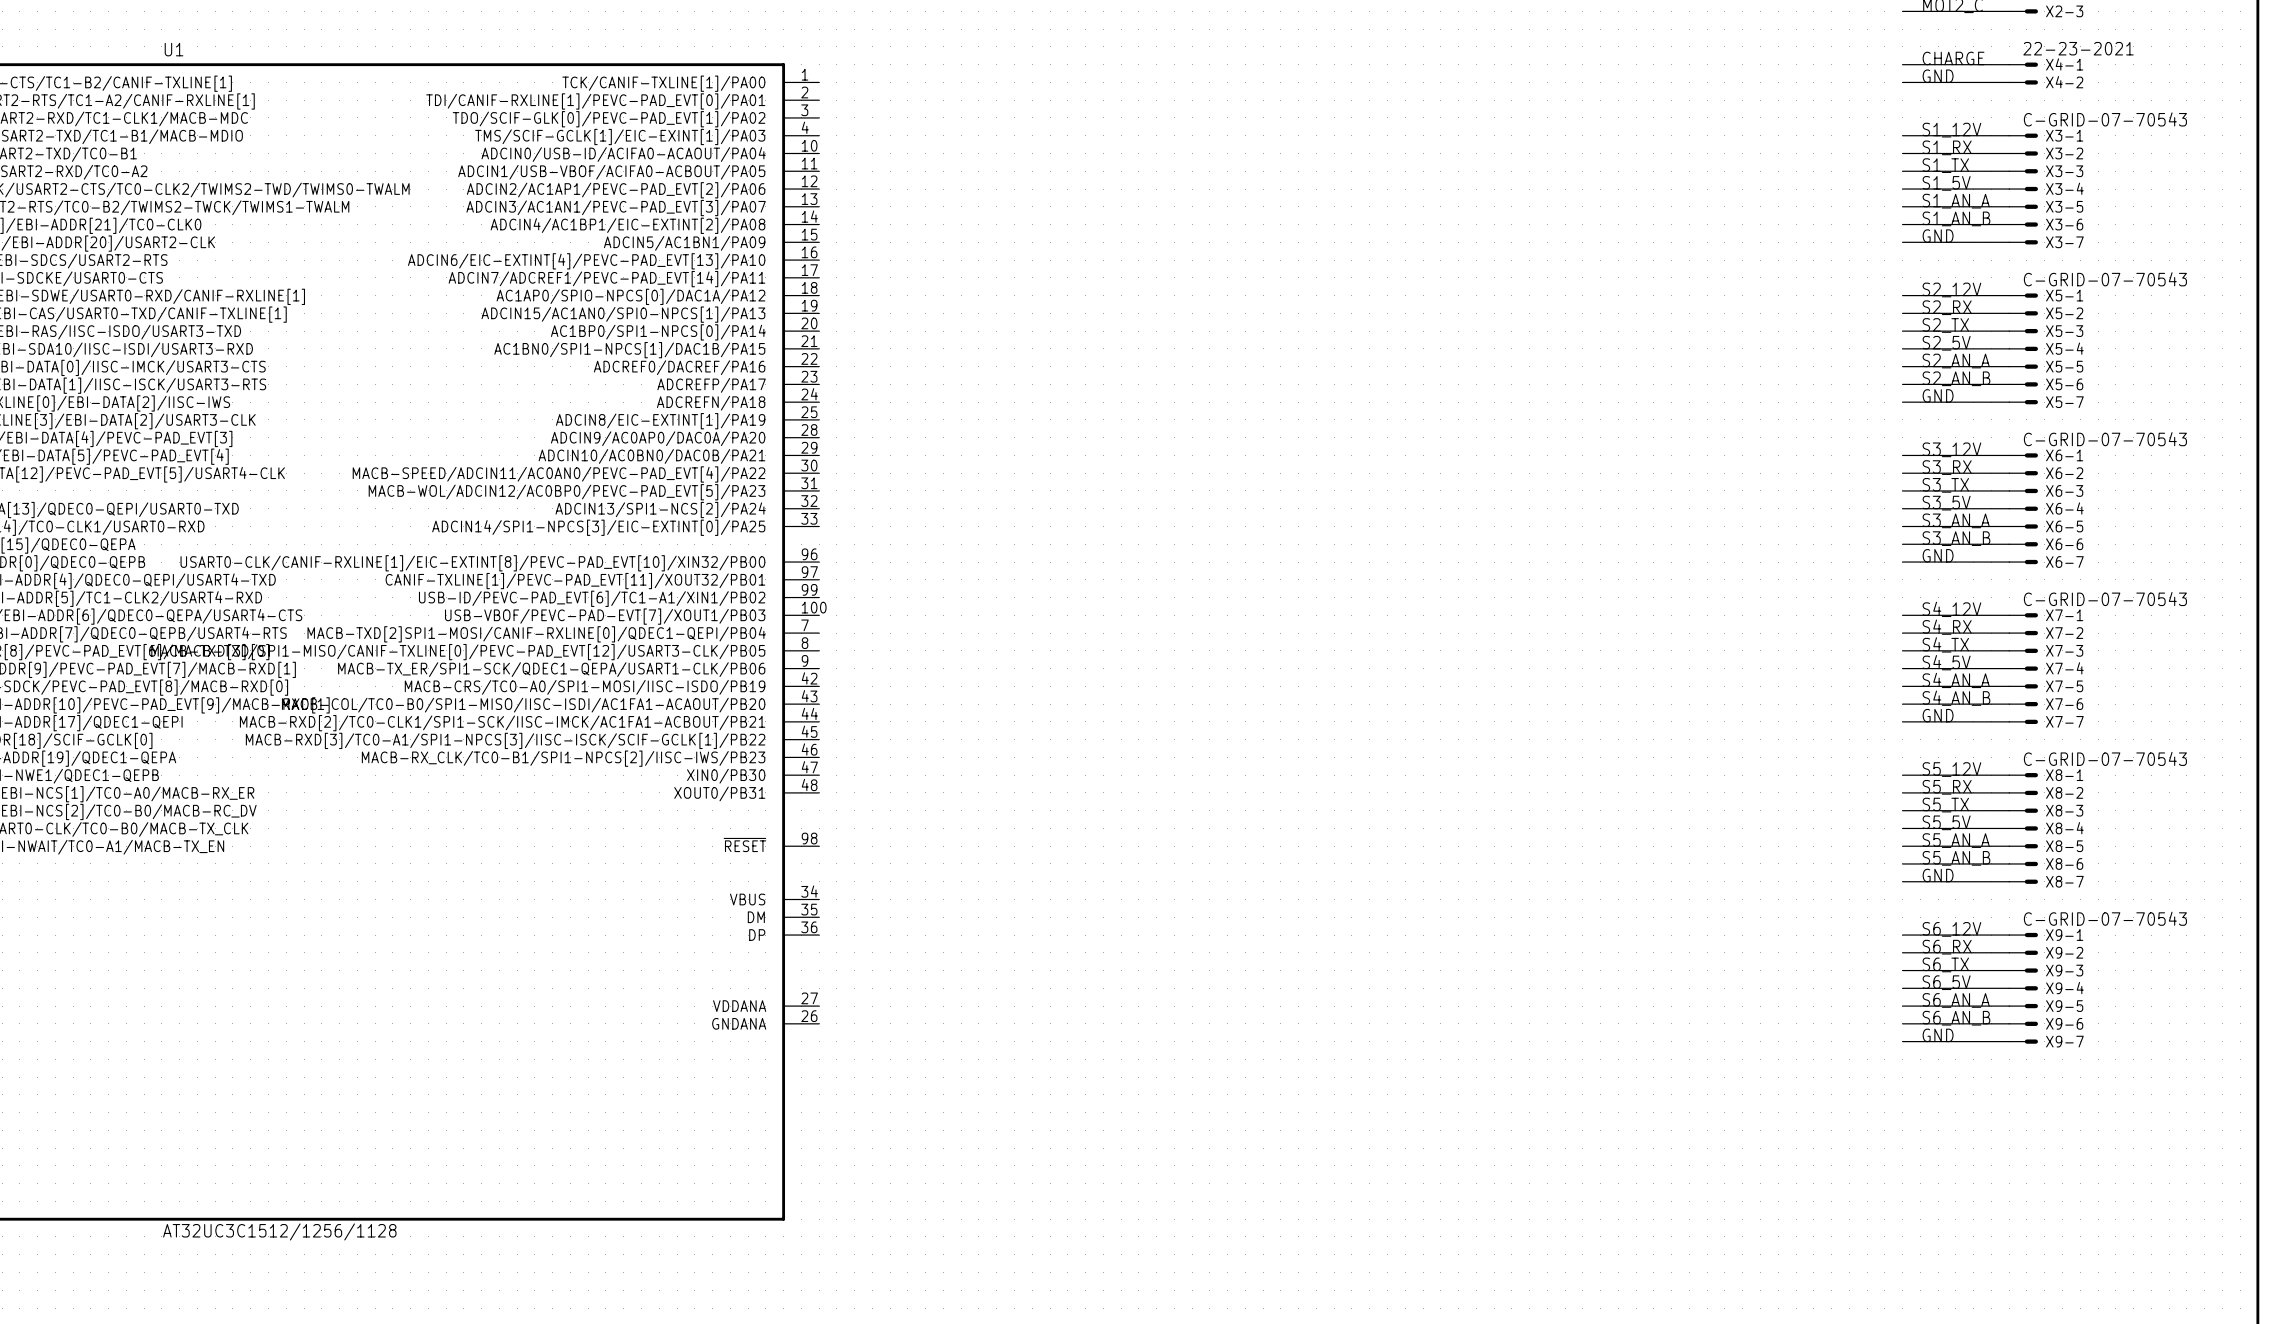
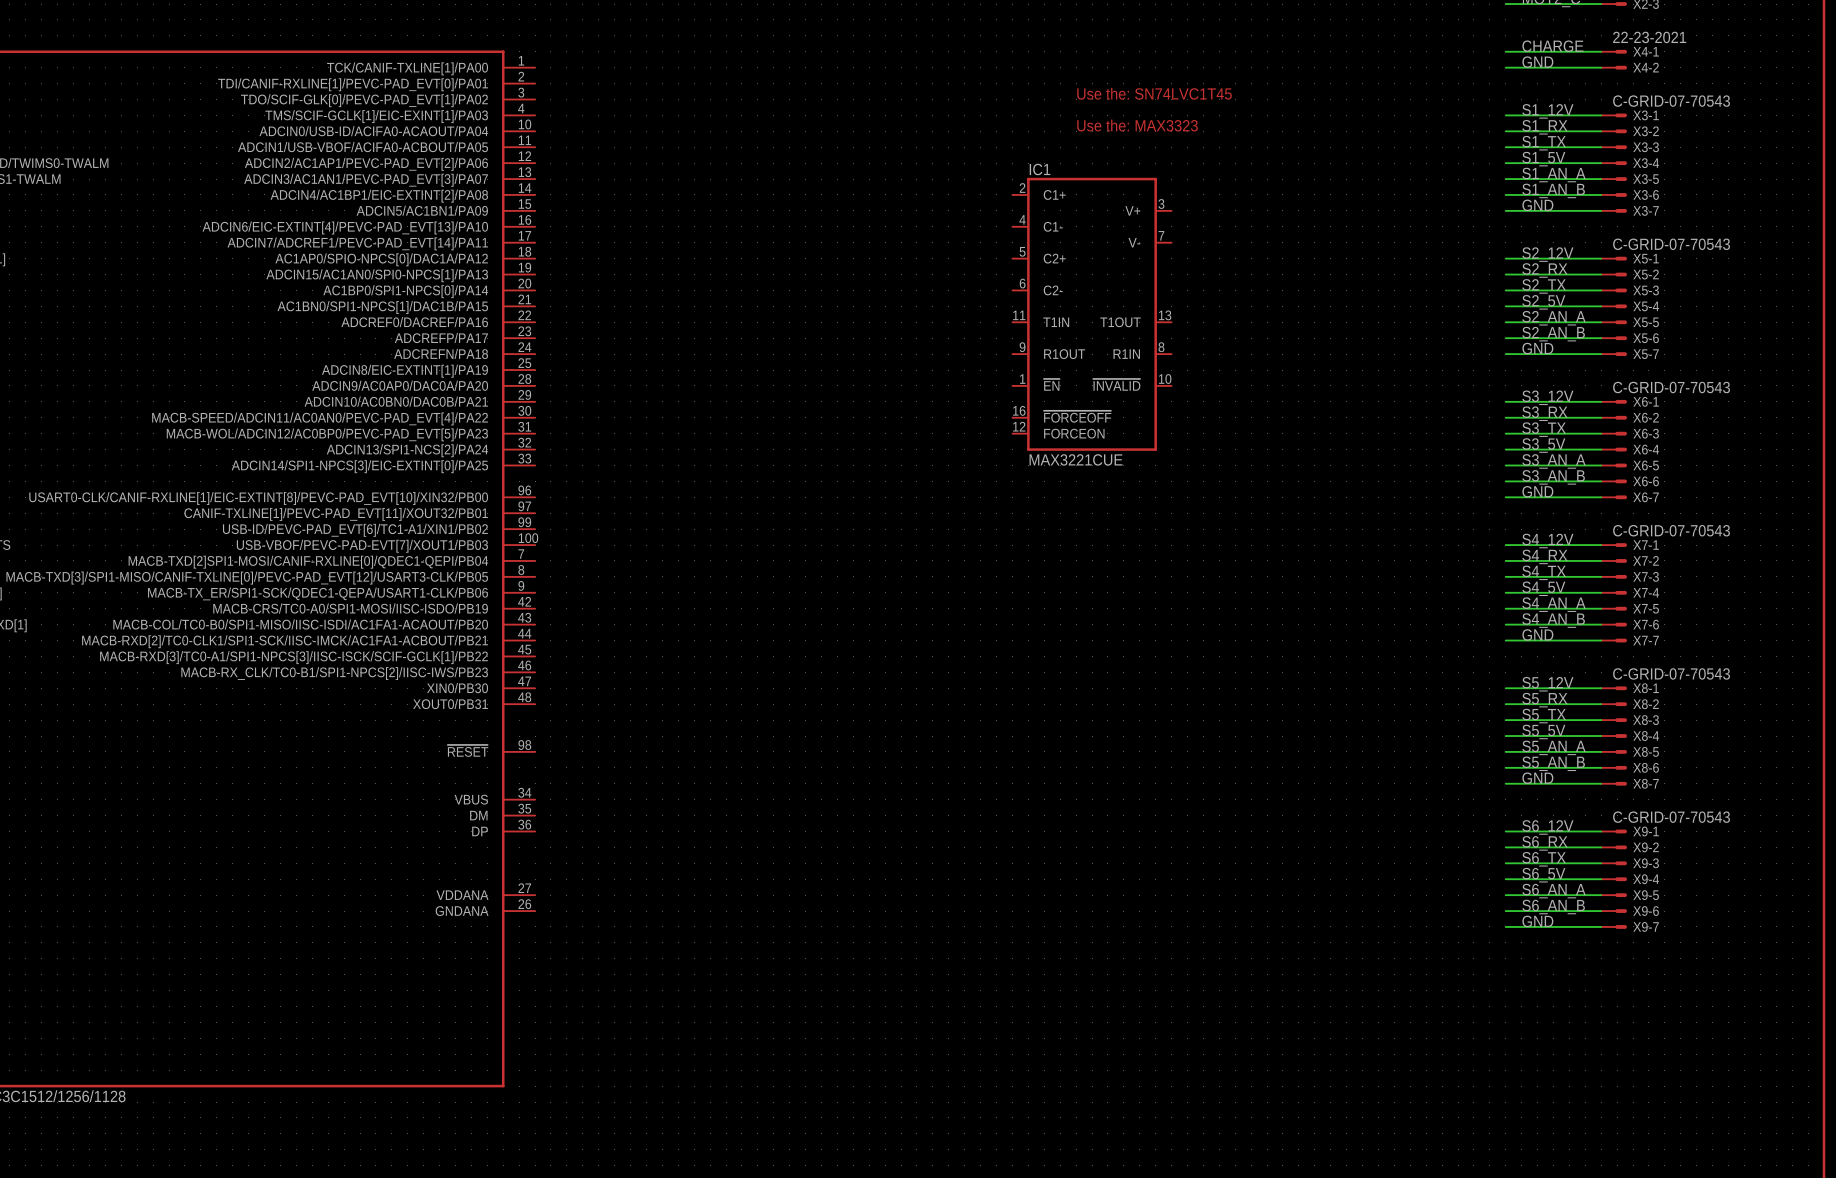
text: none -> Use the: SN74LVC1T45 (1154, 93)
text: none -> Use the: MAX3323 (1137, 125)
IC1: none -> MAX3221CUE (1092, 314)

